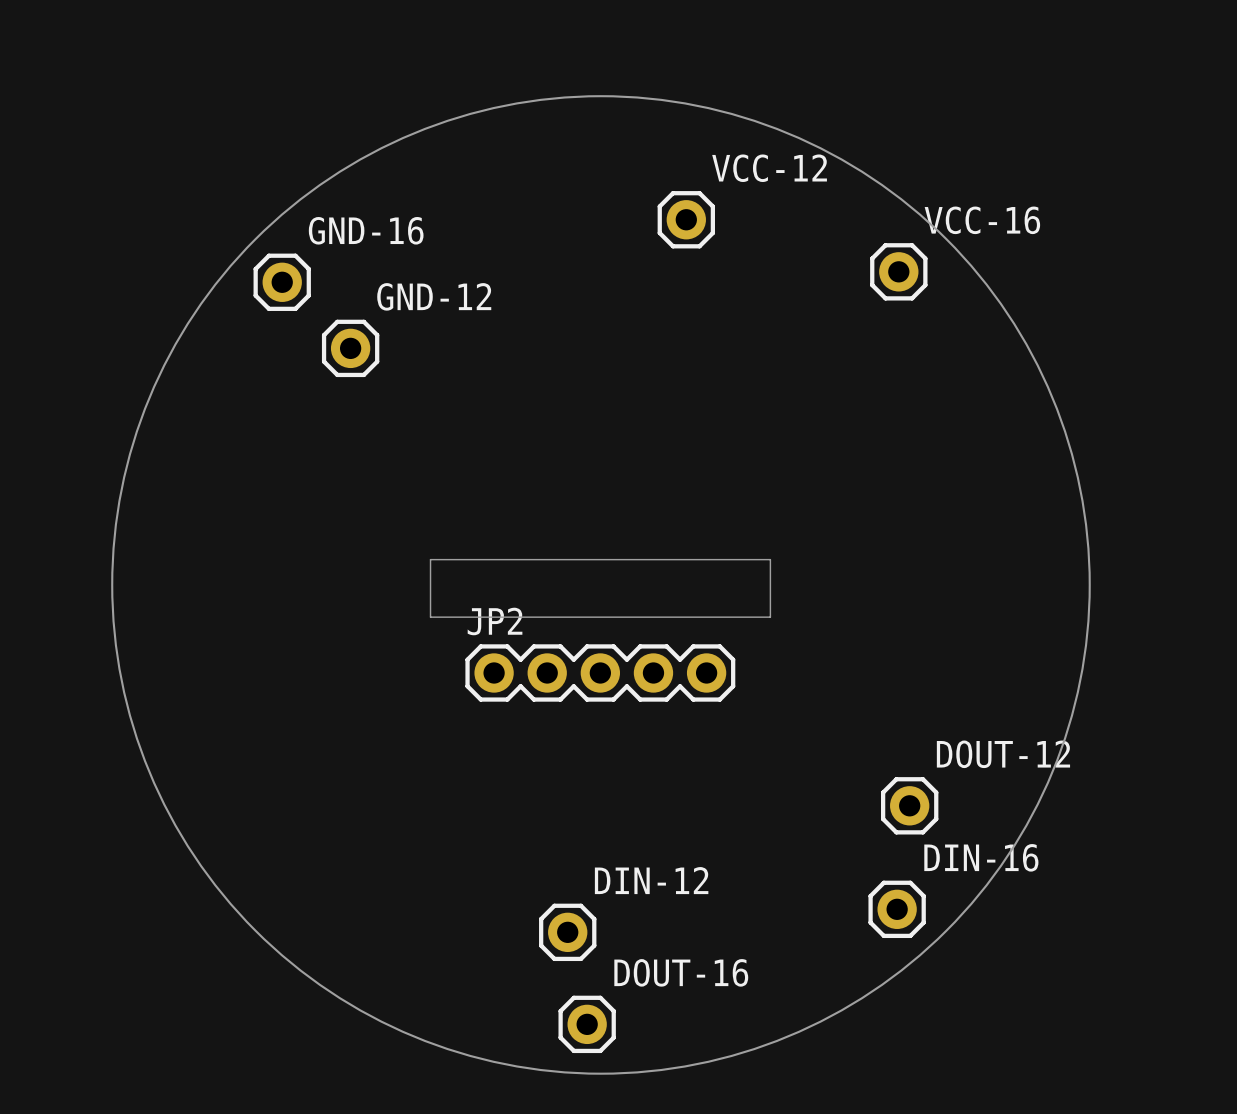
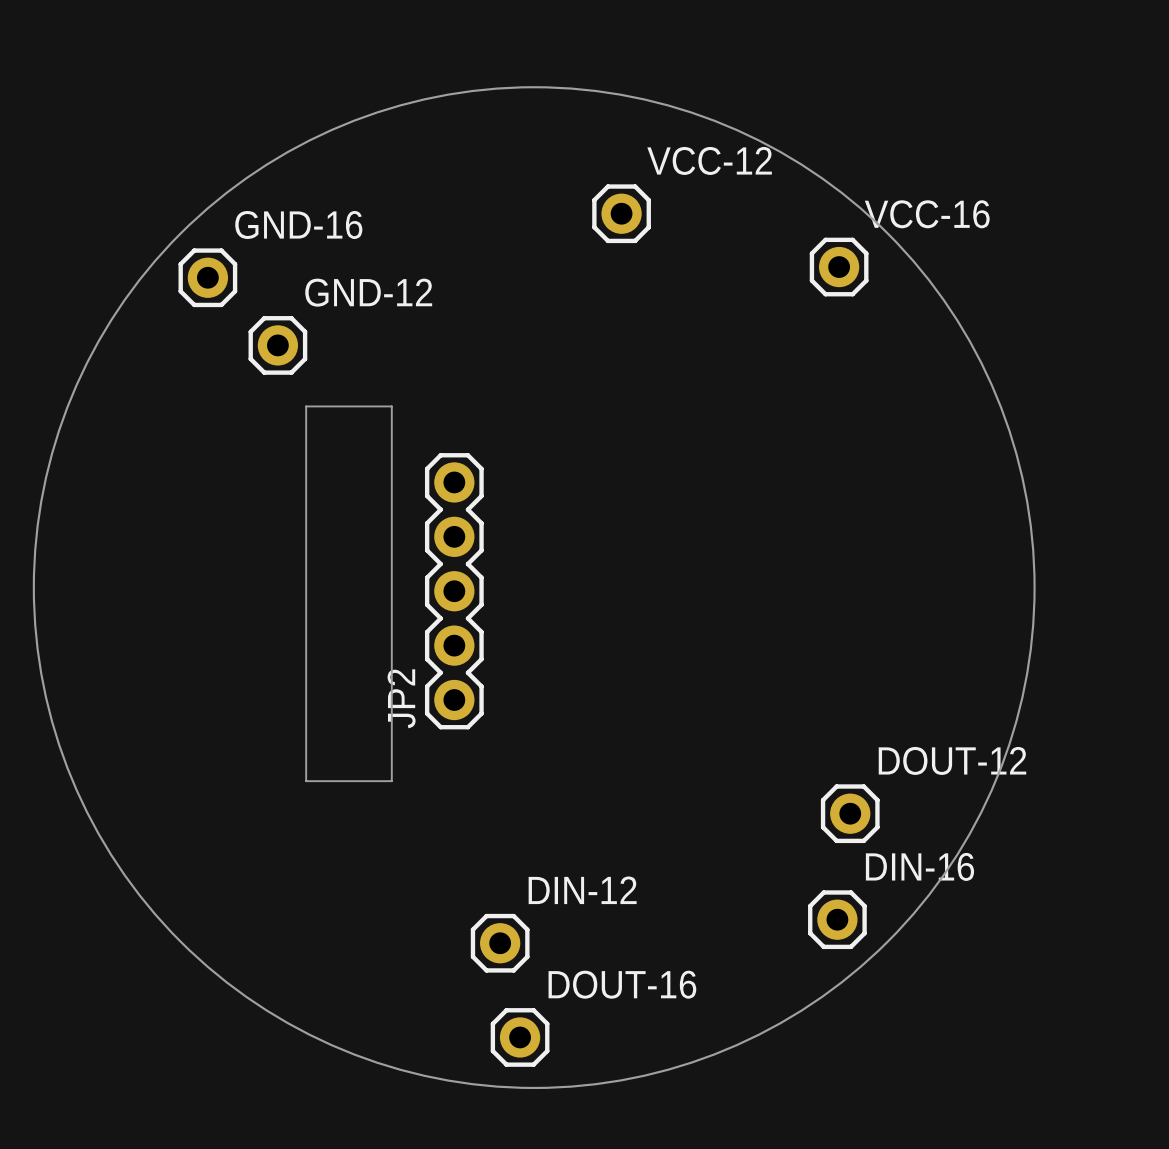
board edge: none -> (306, 406) (391, 406) (391, 781) (306, 781) (306, 406)
board edge: (430, 559) (430, 617) (770, 617) (770, 559) (430, 559) -> none
JP2 name position: JP2 (495, 621) -> JP2 (401, 698)
JP2 rotation: 0° (600, 672) -> 90° clockwise (454, 591)

